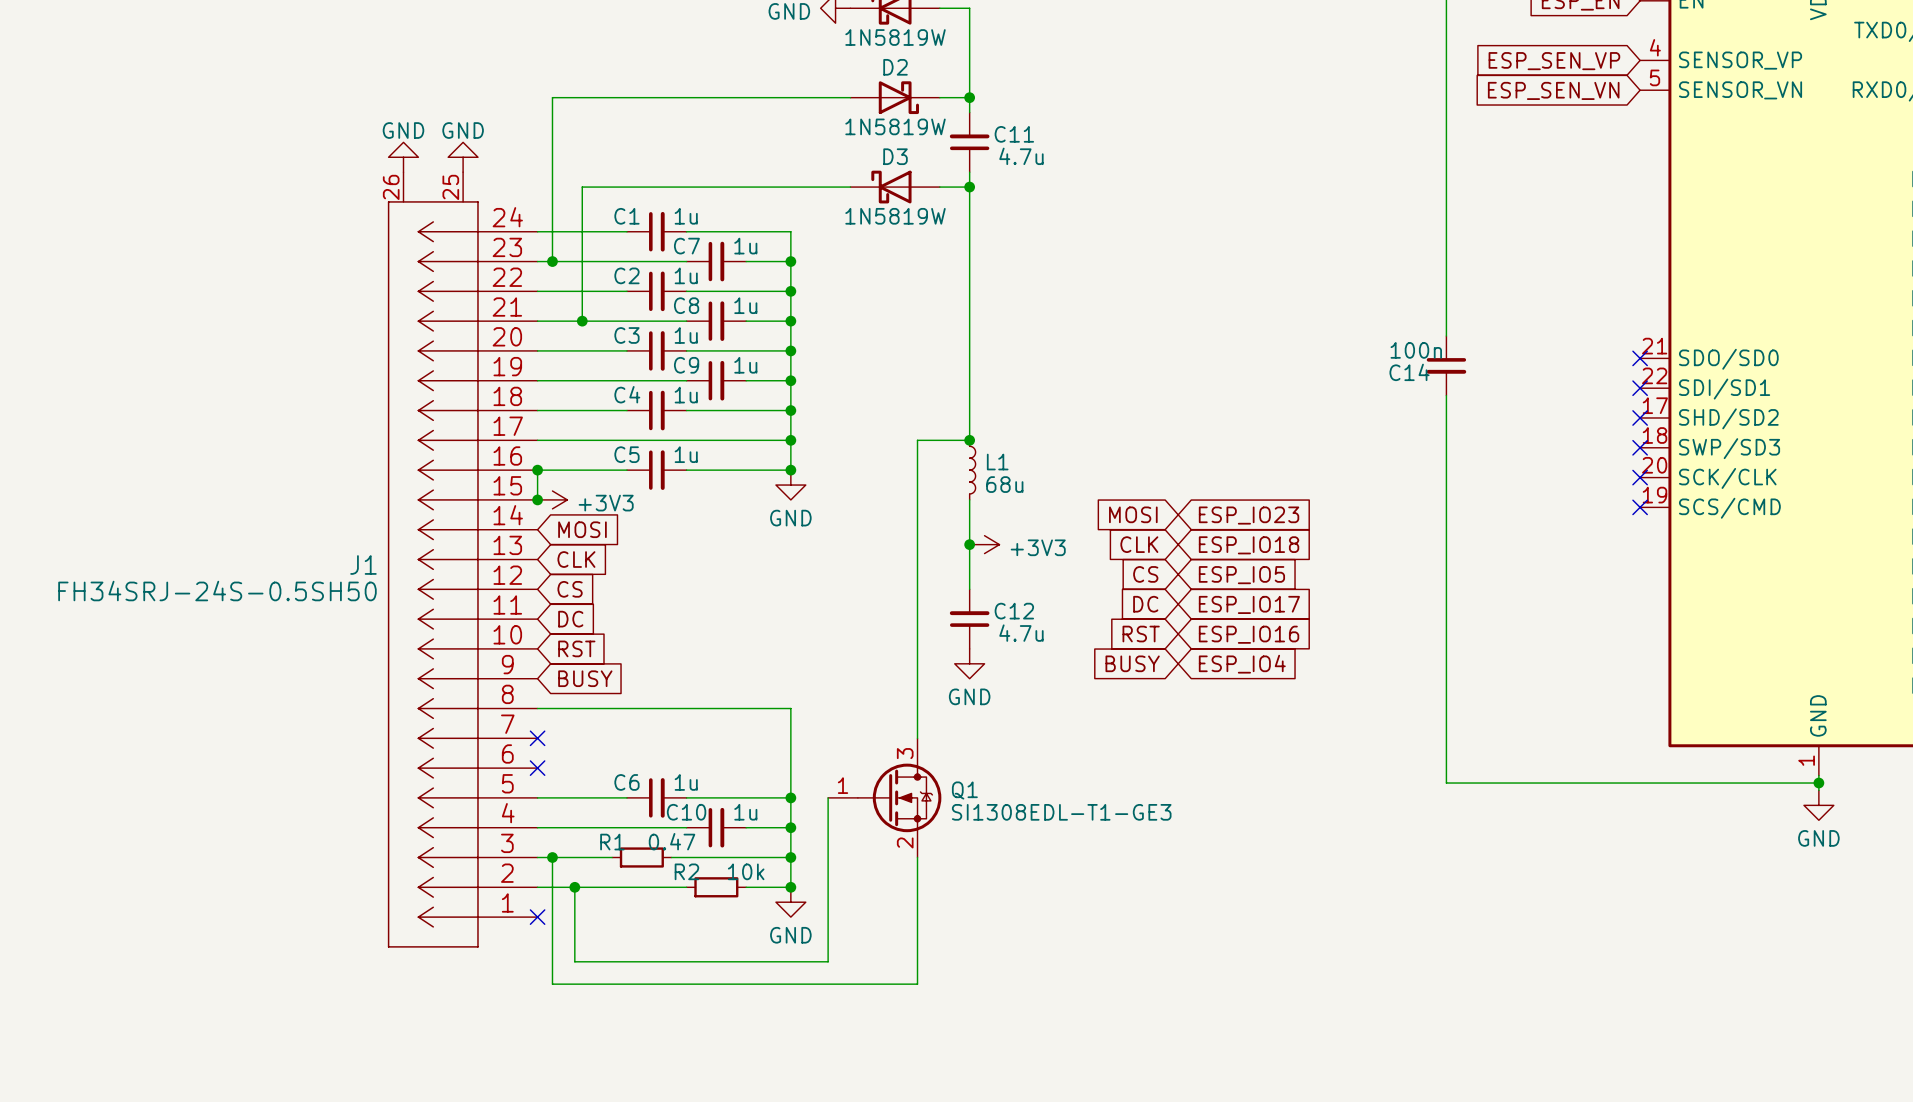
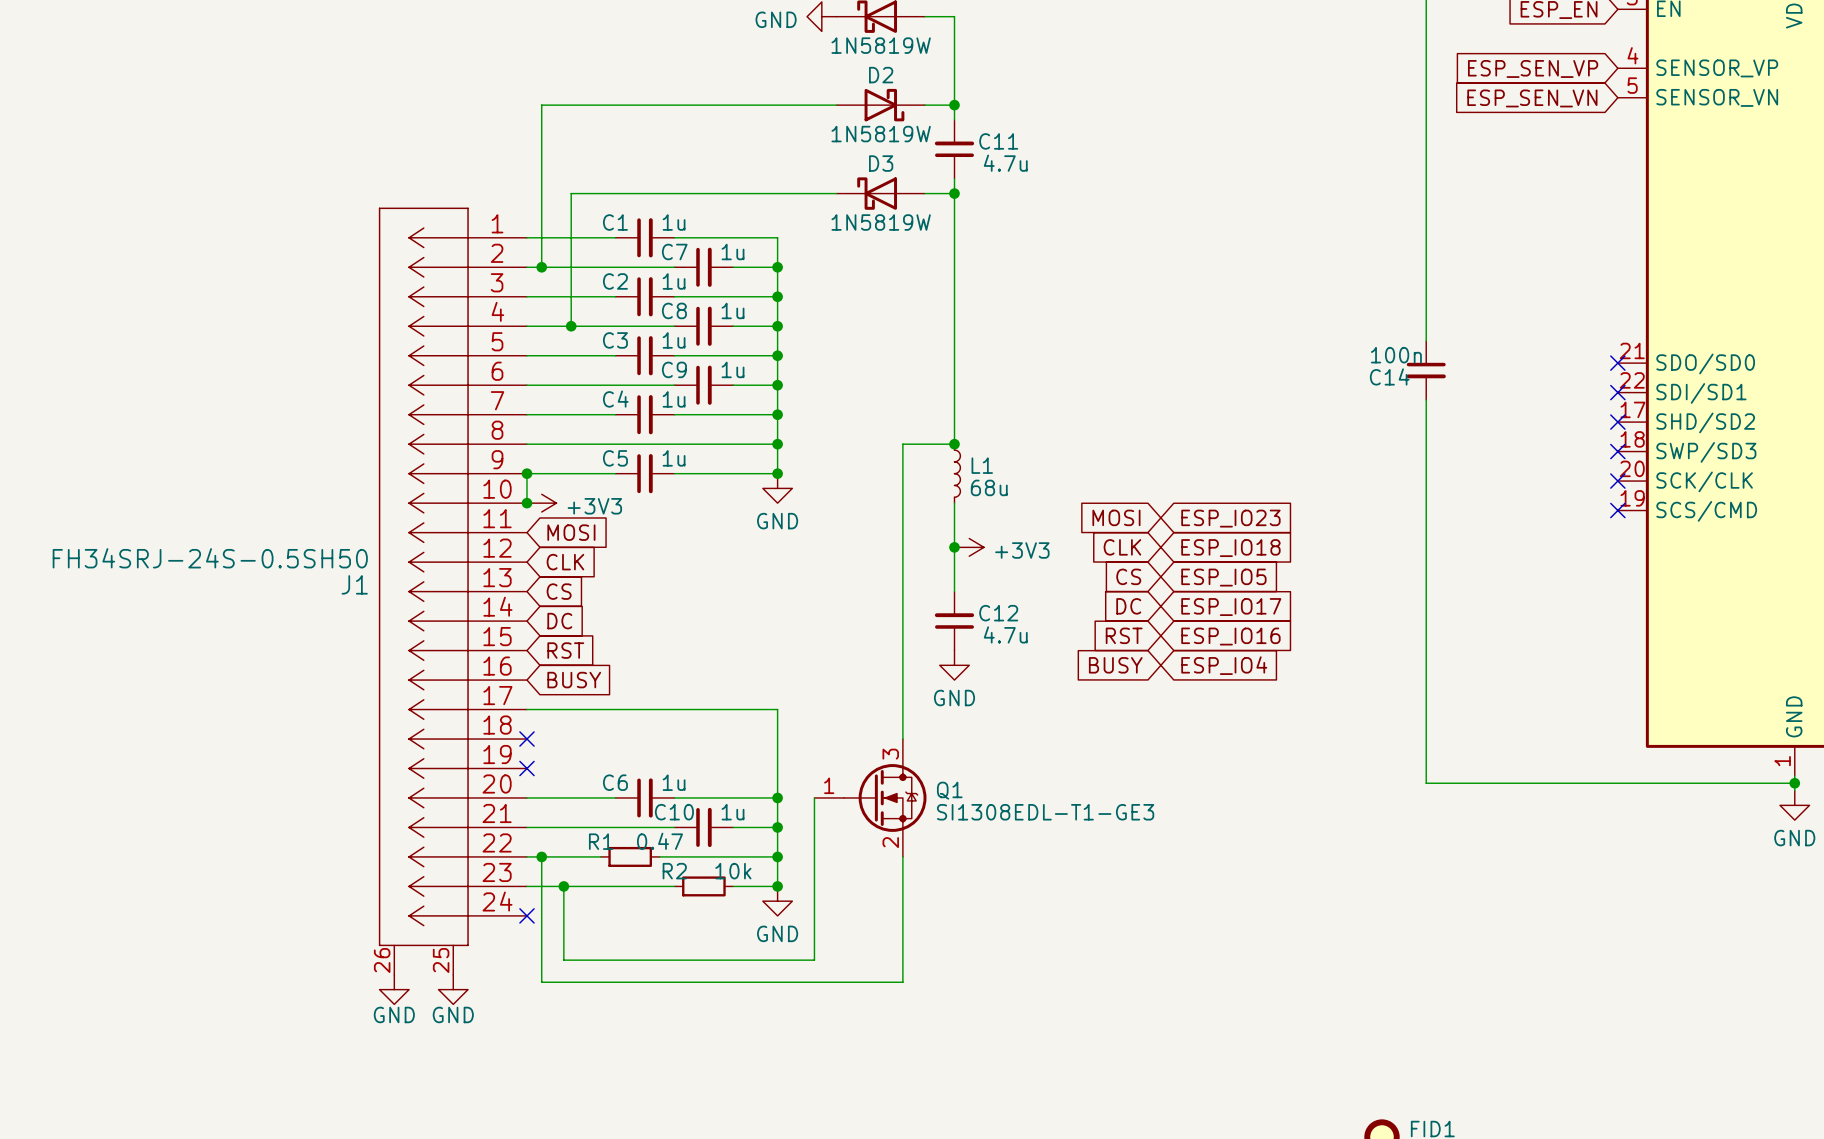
power symbol: GND (403, 157) -> none
power symbol: GND (463, 157) -> none
J1 flip: as is (433, 574) -> up-down (423, 576)
power symbol: none -> GND (394, 989)
power symbol: none -> GND (453, 989)

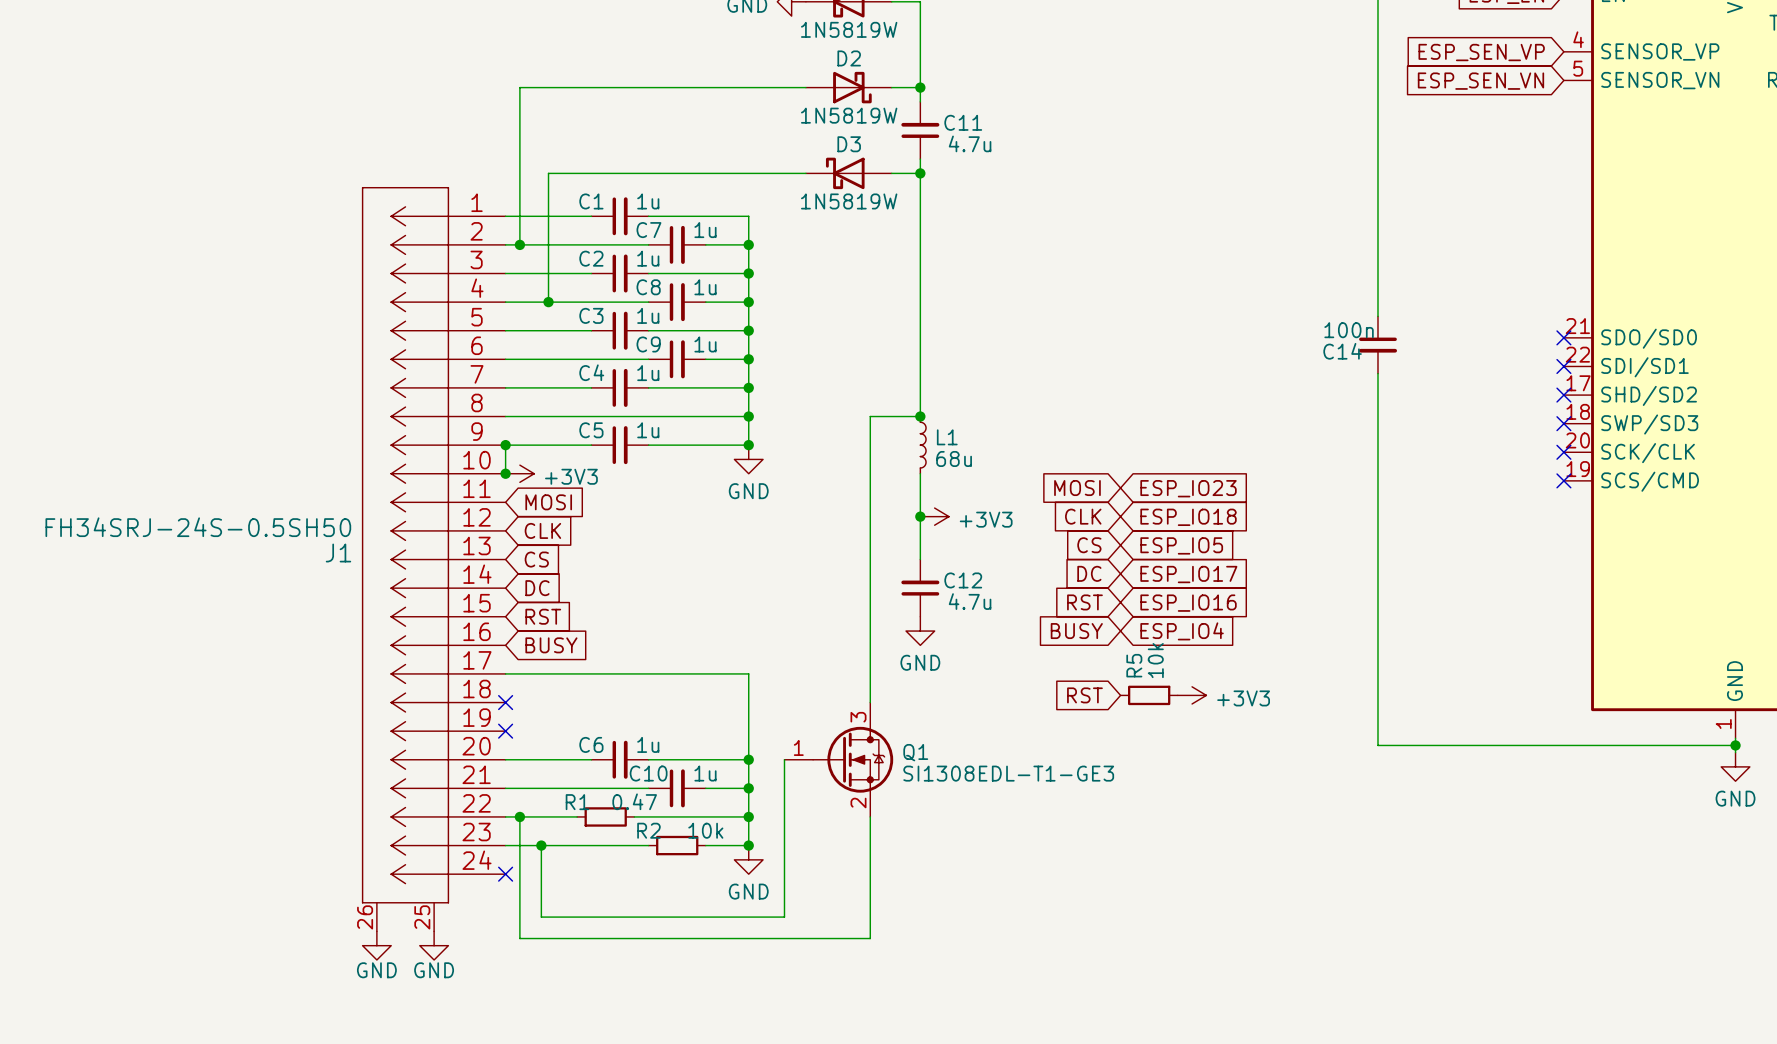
global label: none -> RST (1084, 695)
R5: none -> 10k (1149, 695)
power symbol: none -> +3V3 (1192, 695)

